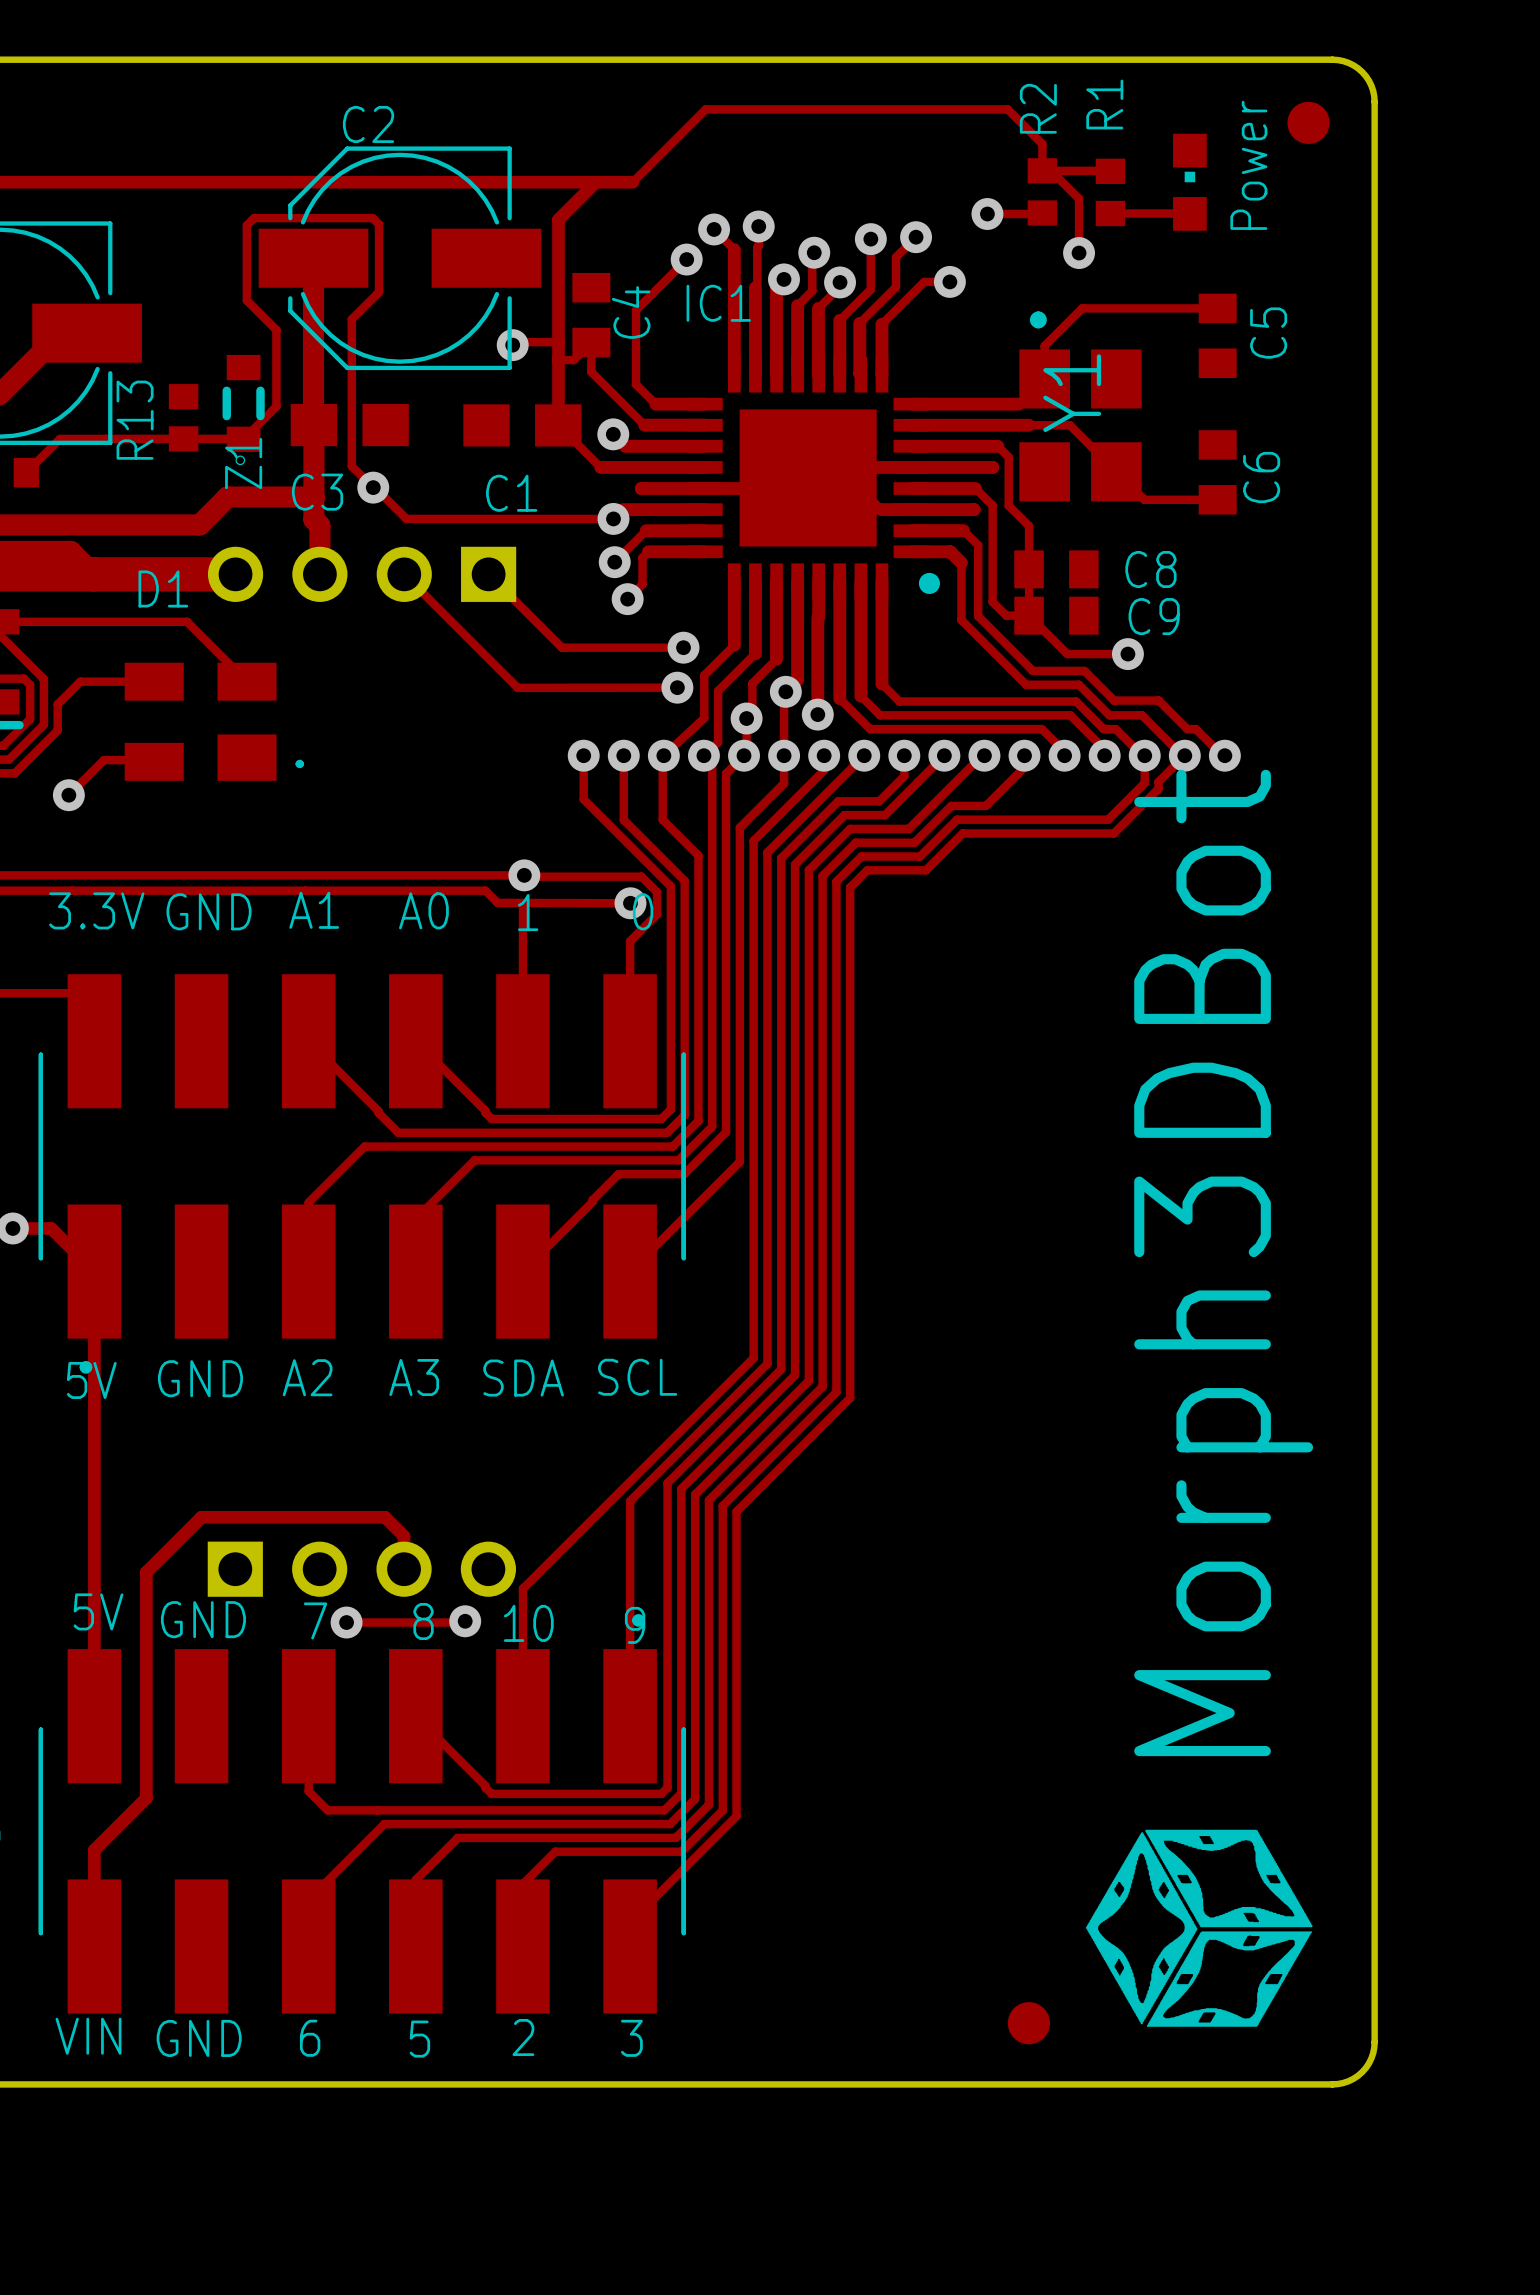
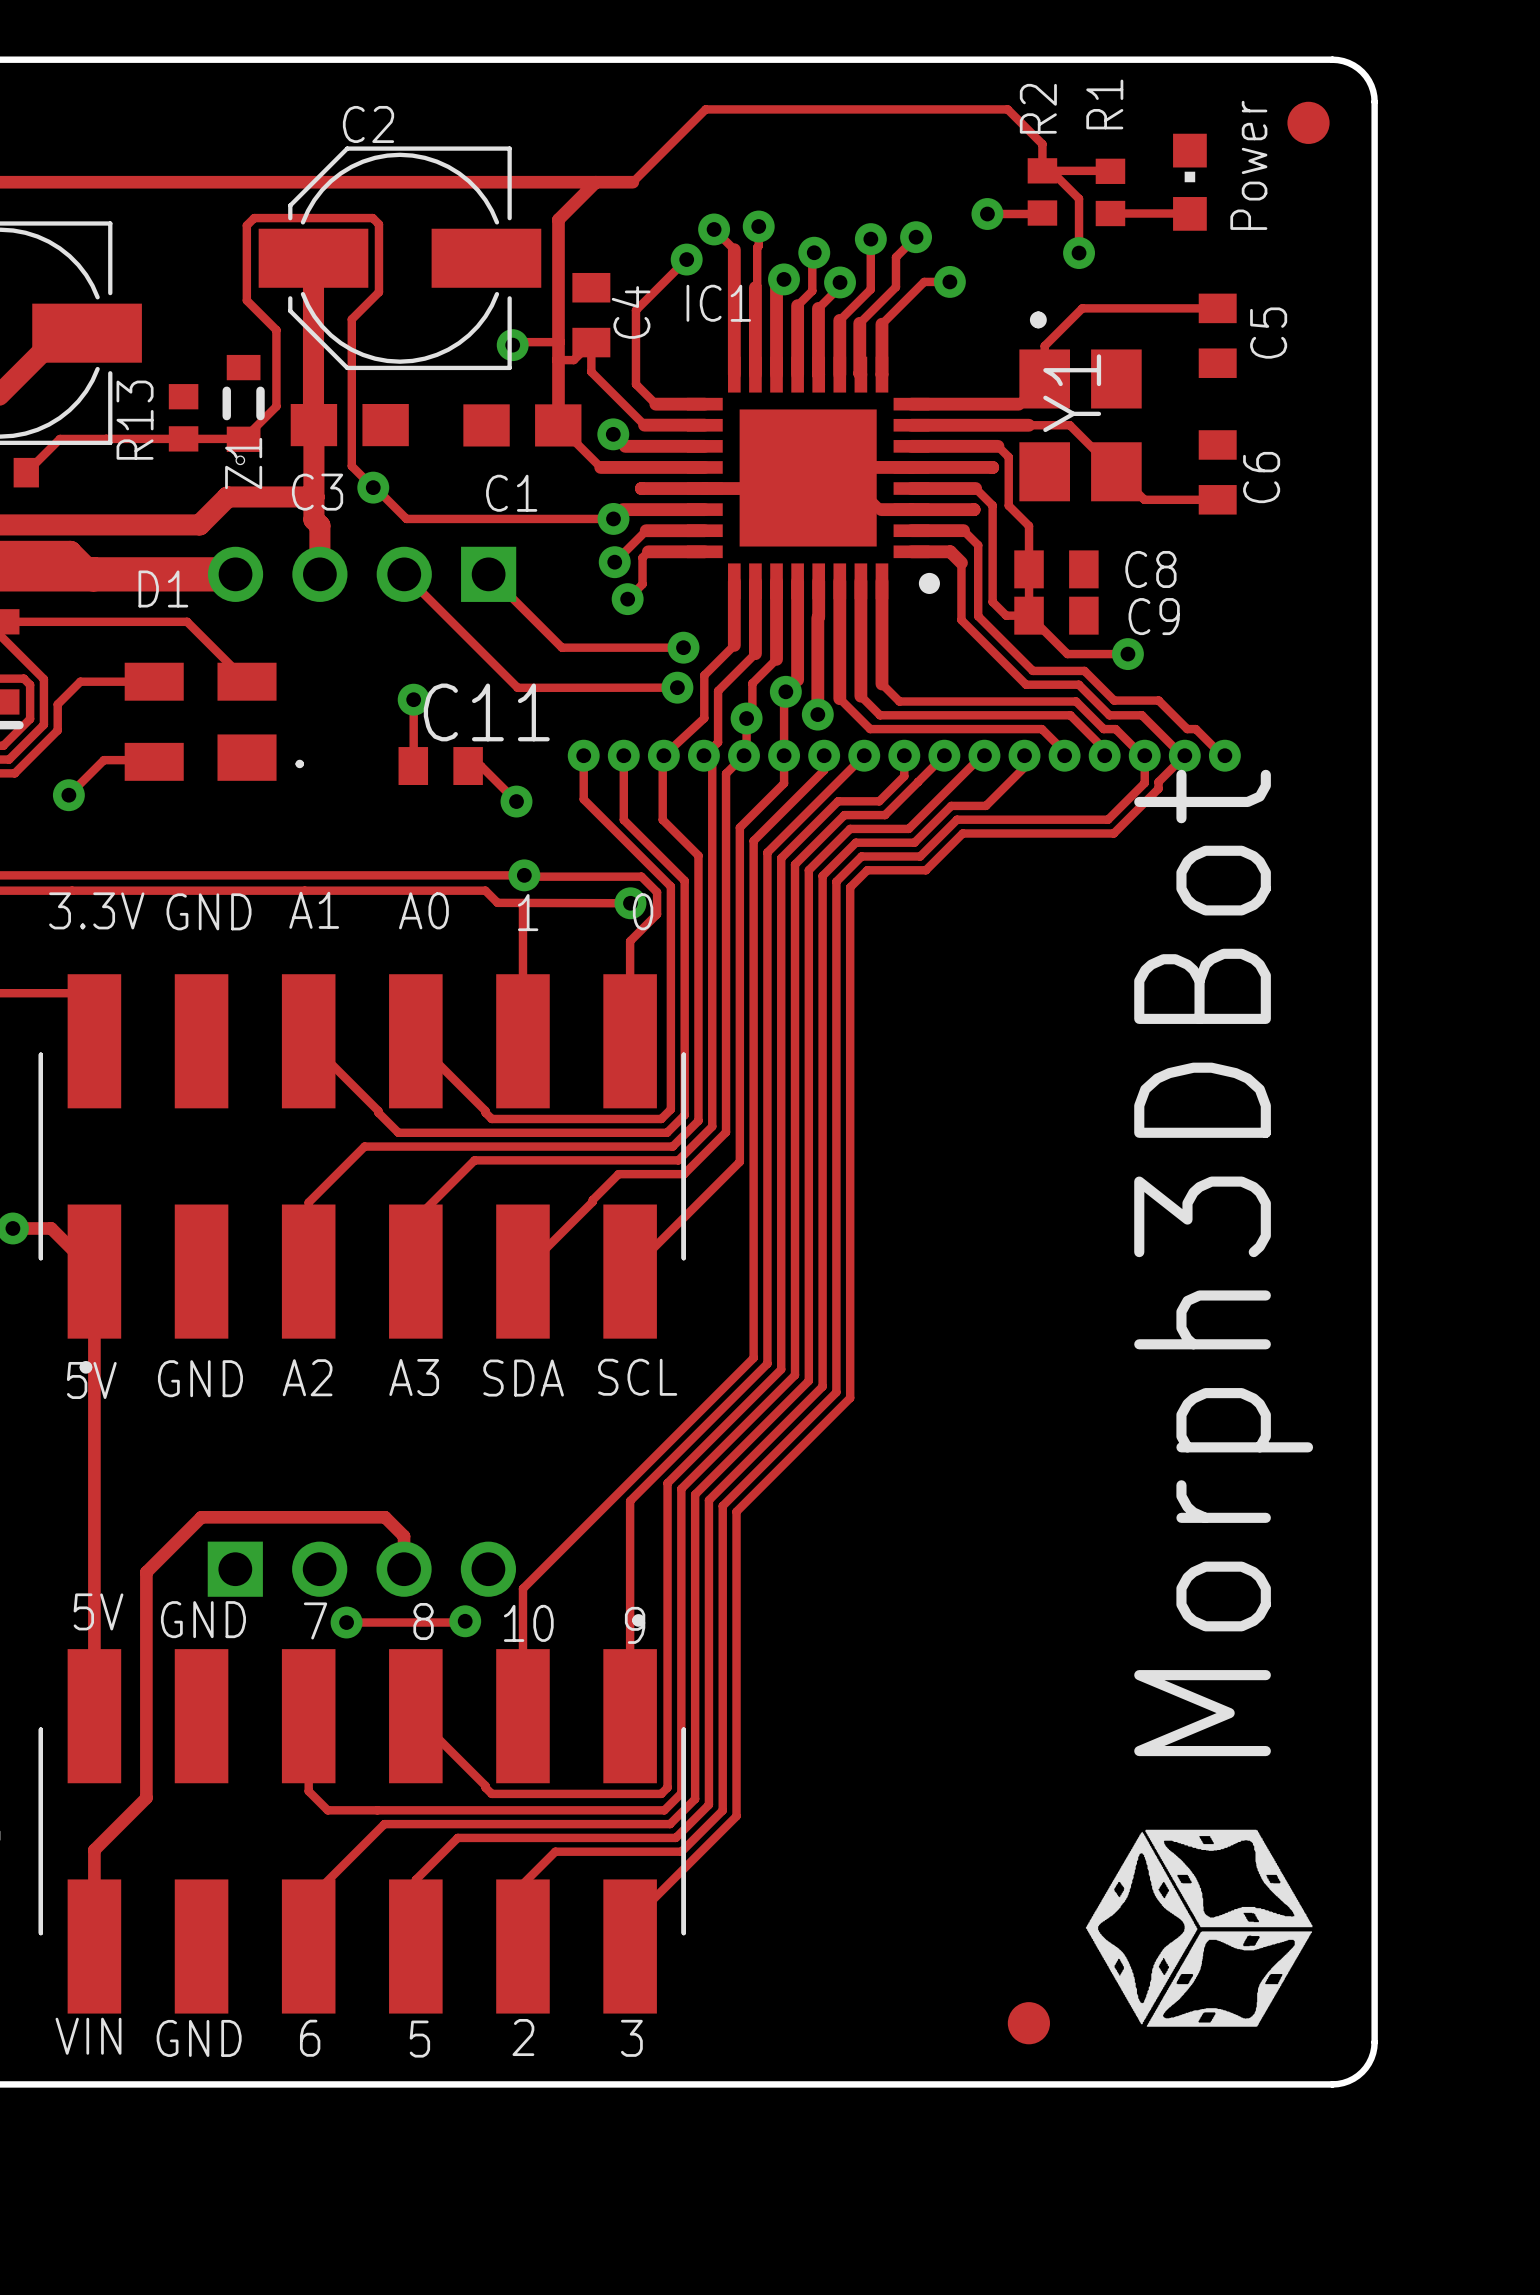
track: none -> (413, 699) (413, 765)
via: none -> (413, 699)
C11: none -> (440, 766)
track: none -> (468, 766) (480, 766) (516, 801)
via: none -> (516, 801)

